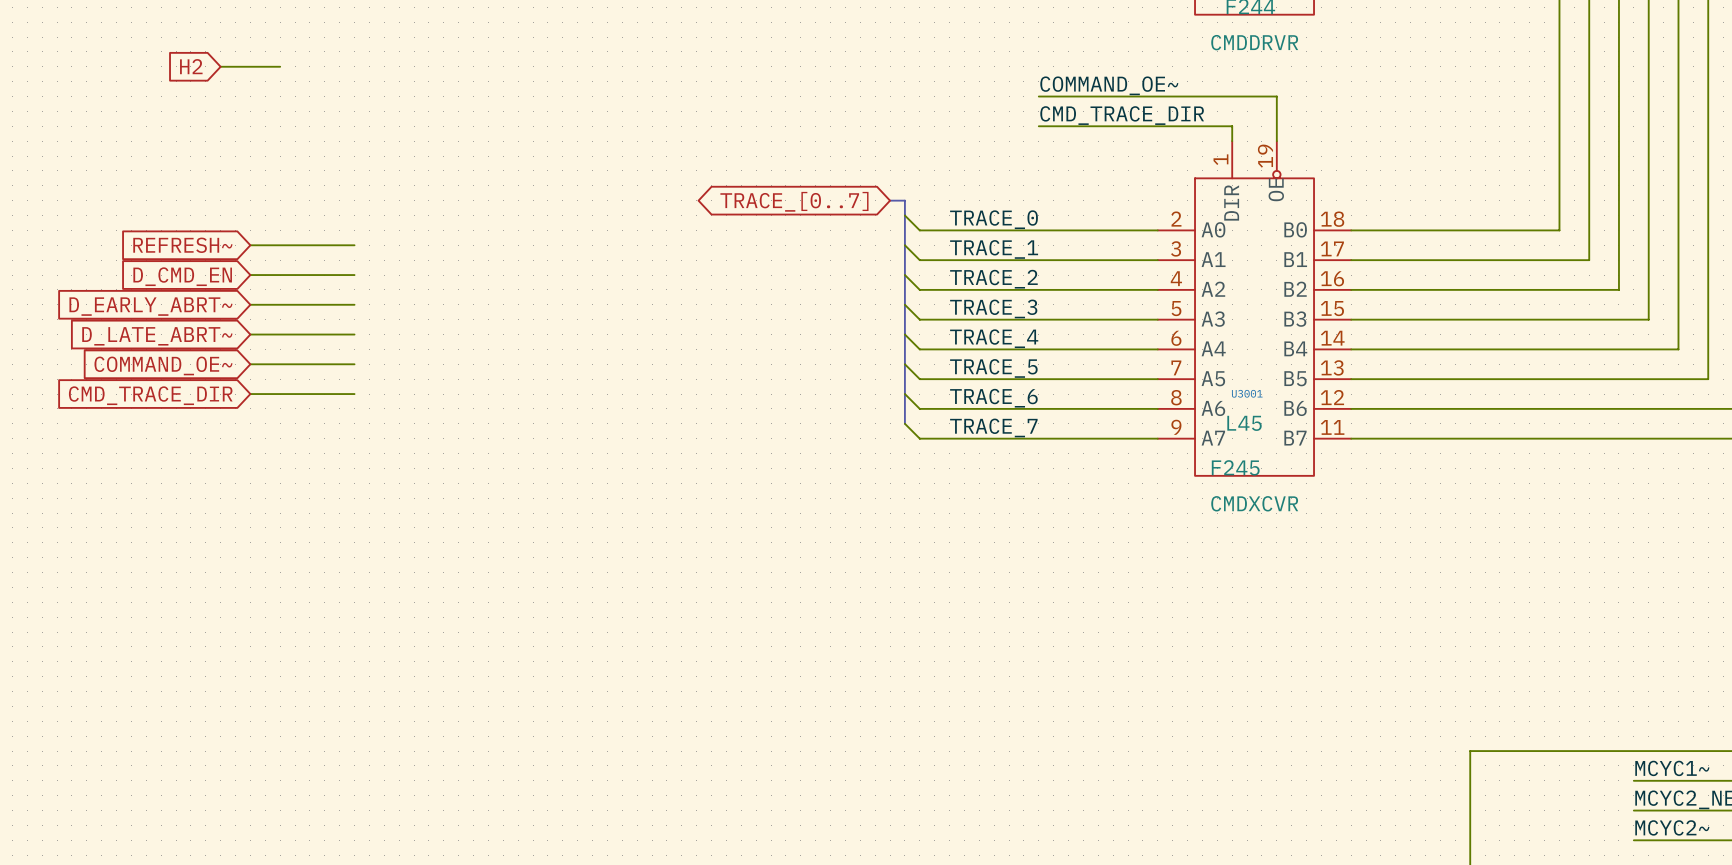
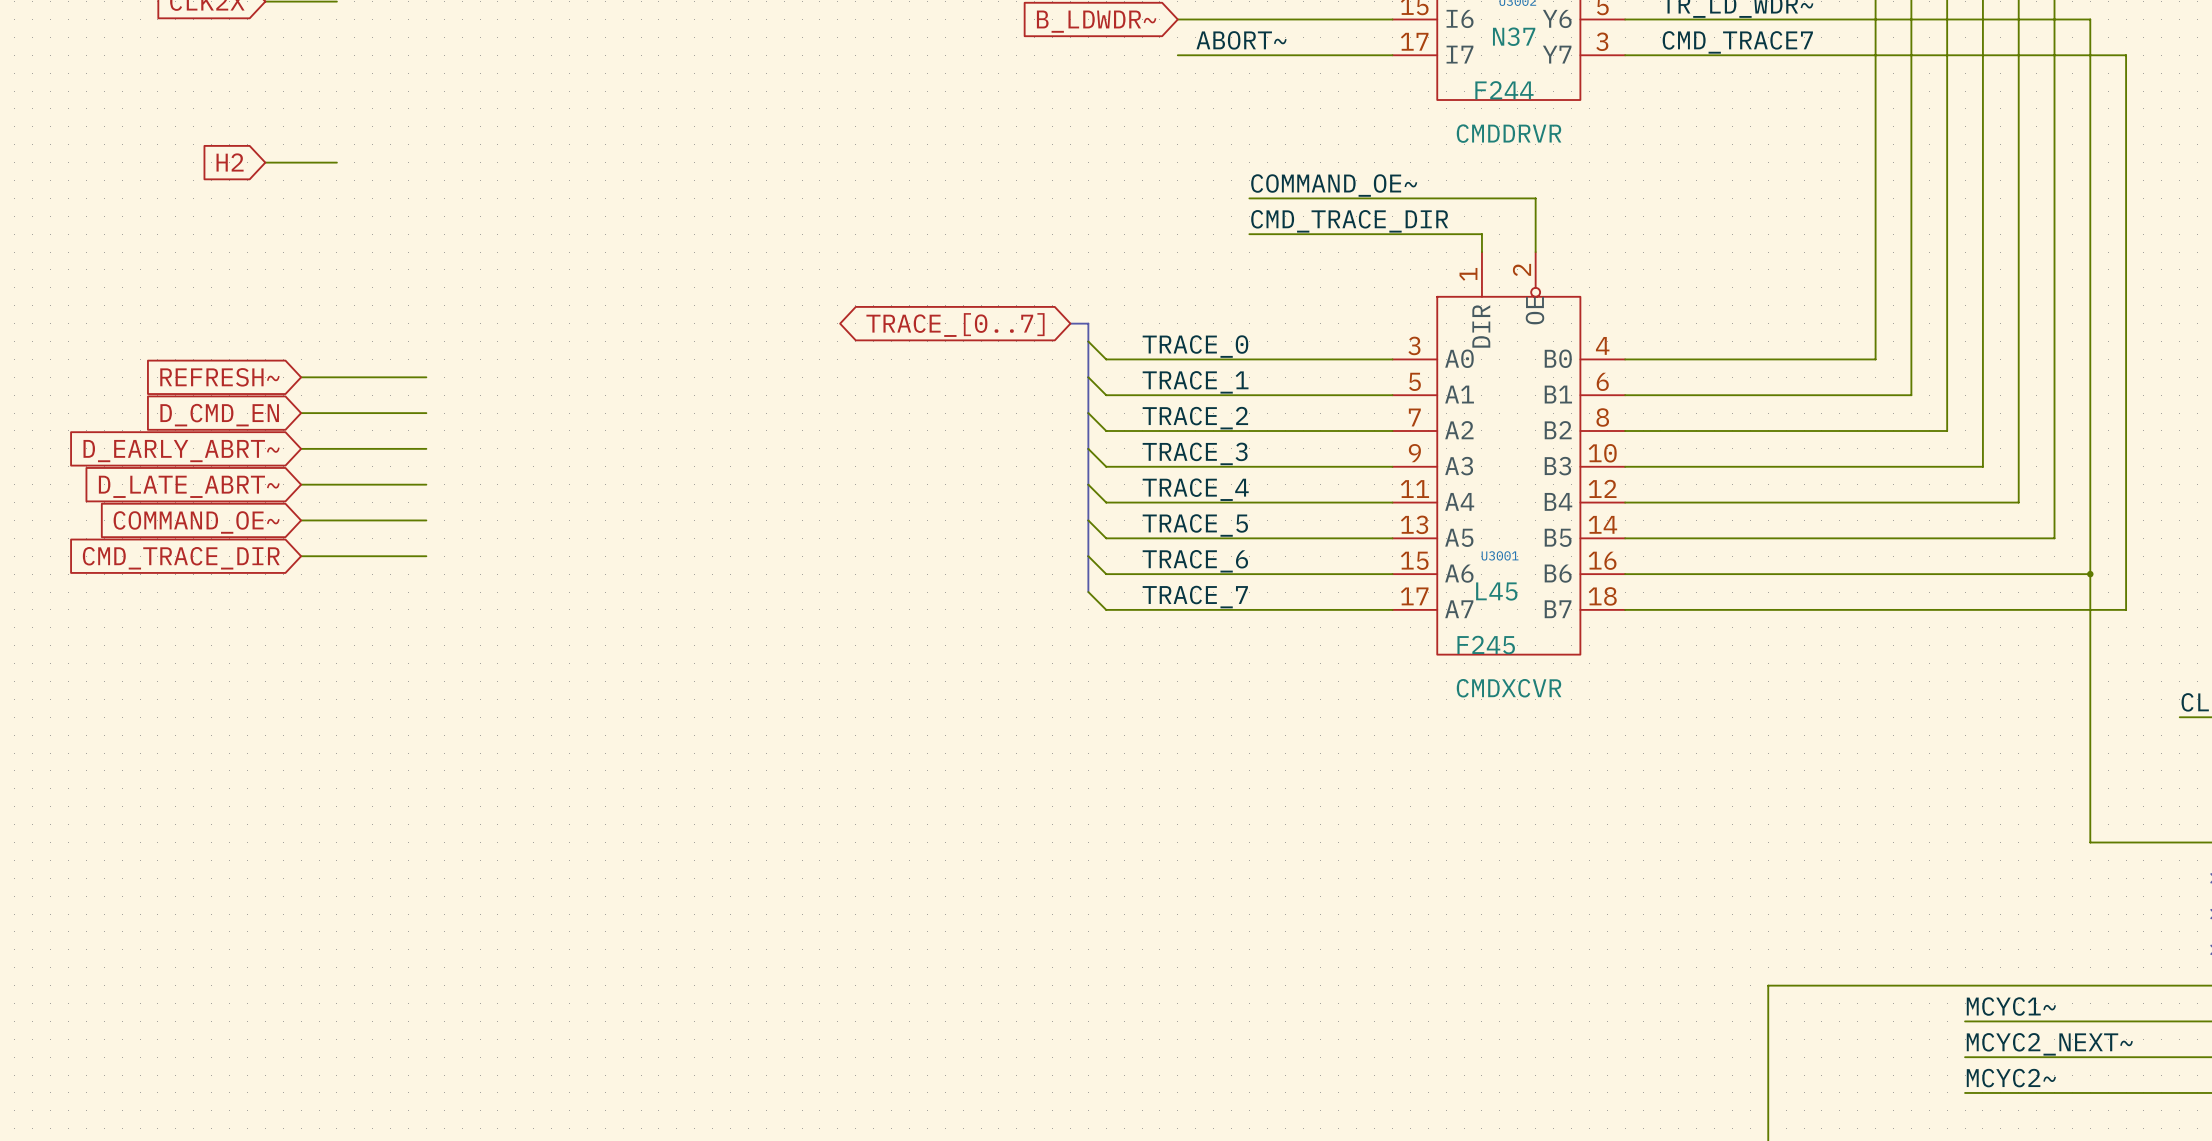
U3001 symbol: [1157, 141, 1352, 476] -> [1392, 252, 1626, 655]

